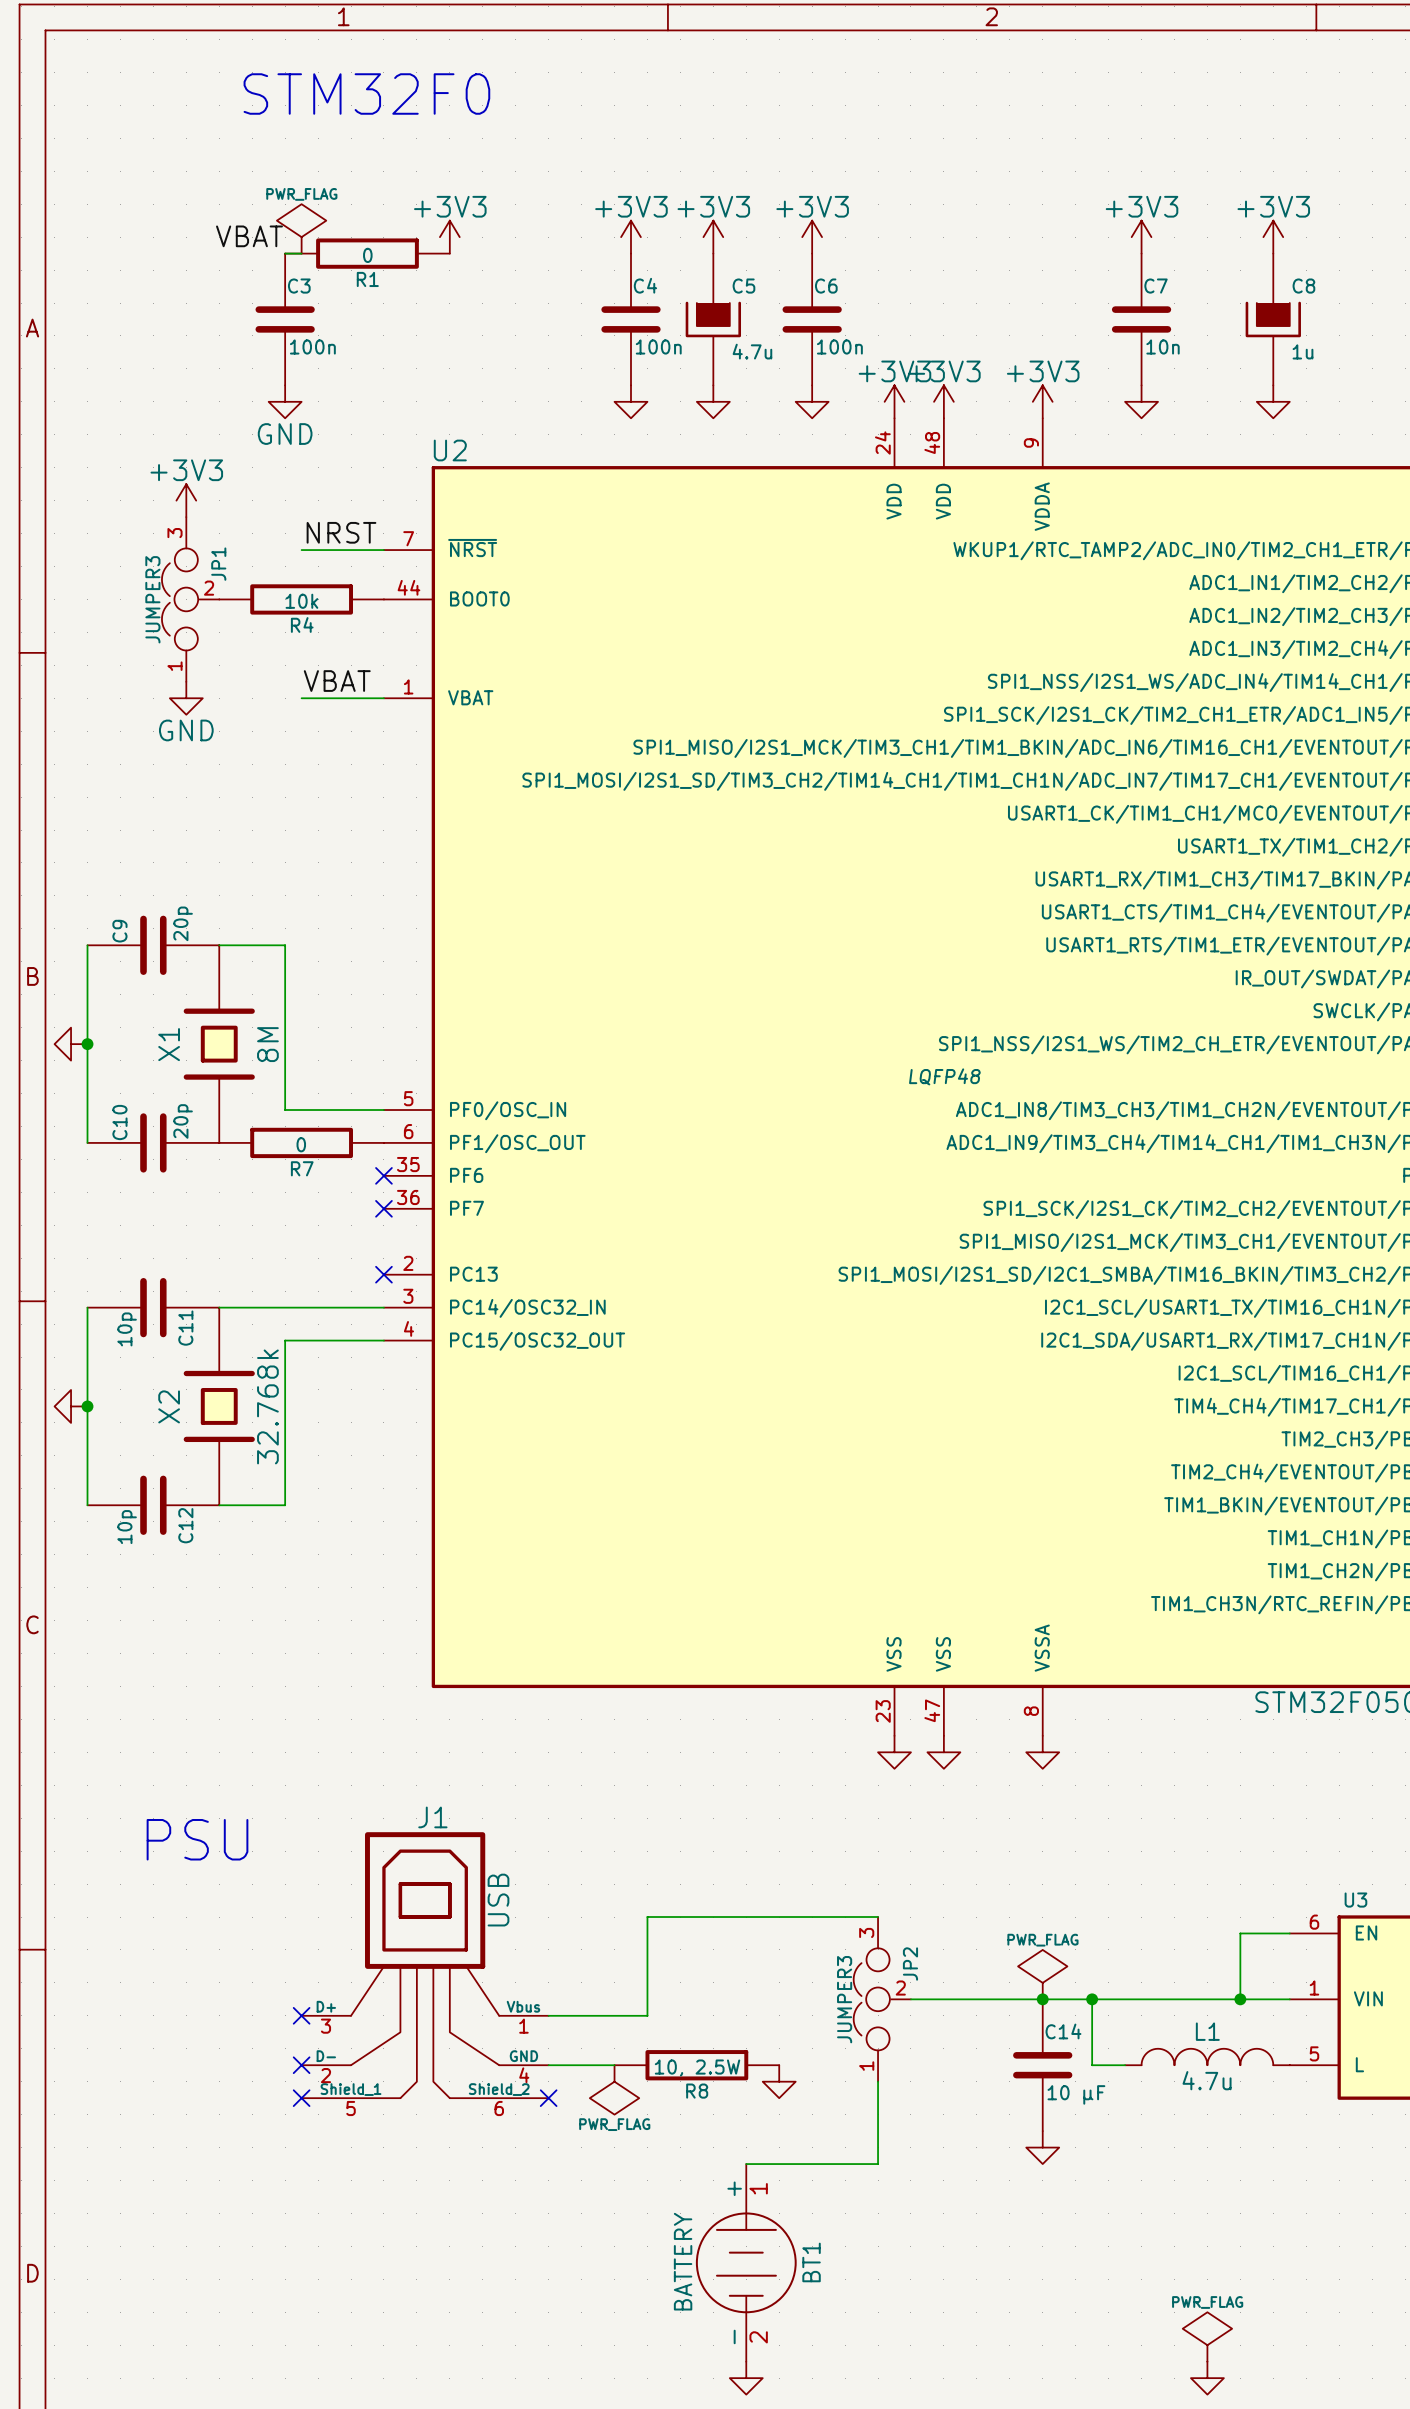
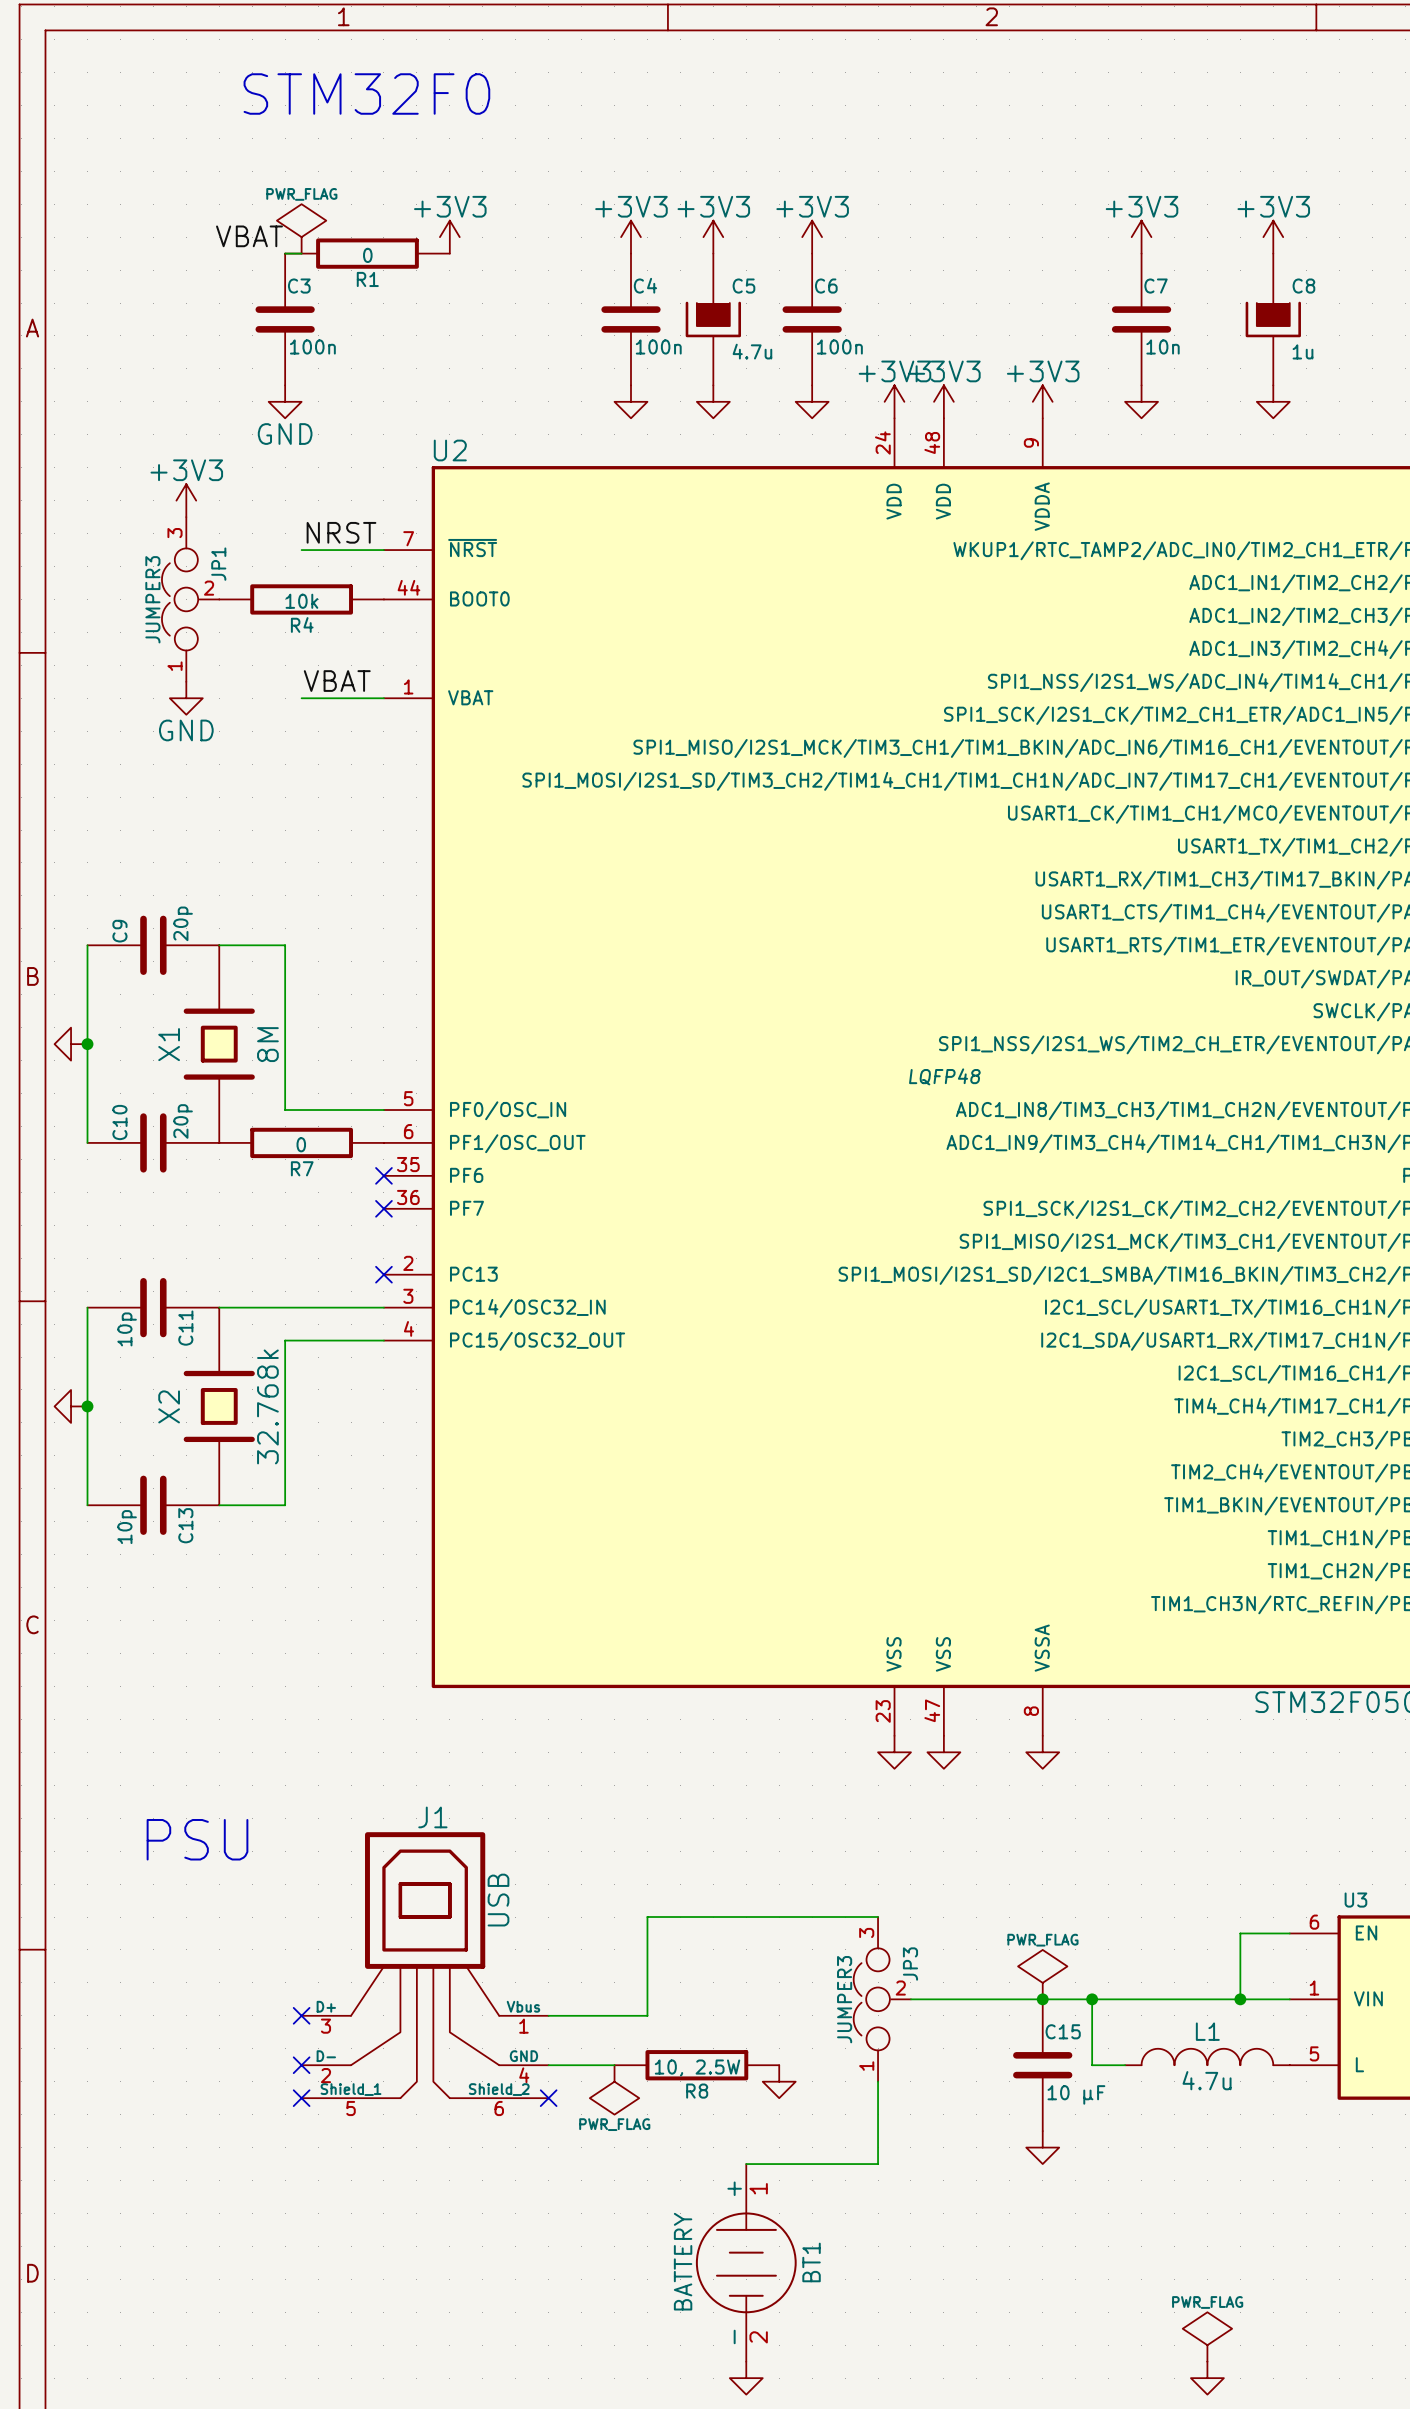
C12 name: C12 (185, 1525) -> C13 (185, 1525)
JP2 name: JP2 (910, 1964) -> JP3 (910, 1964)
C14 name: C14 (1063, 2031) -> C15 (1063, 2031)

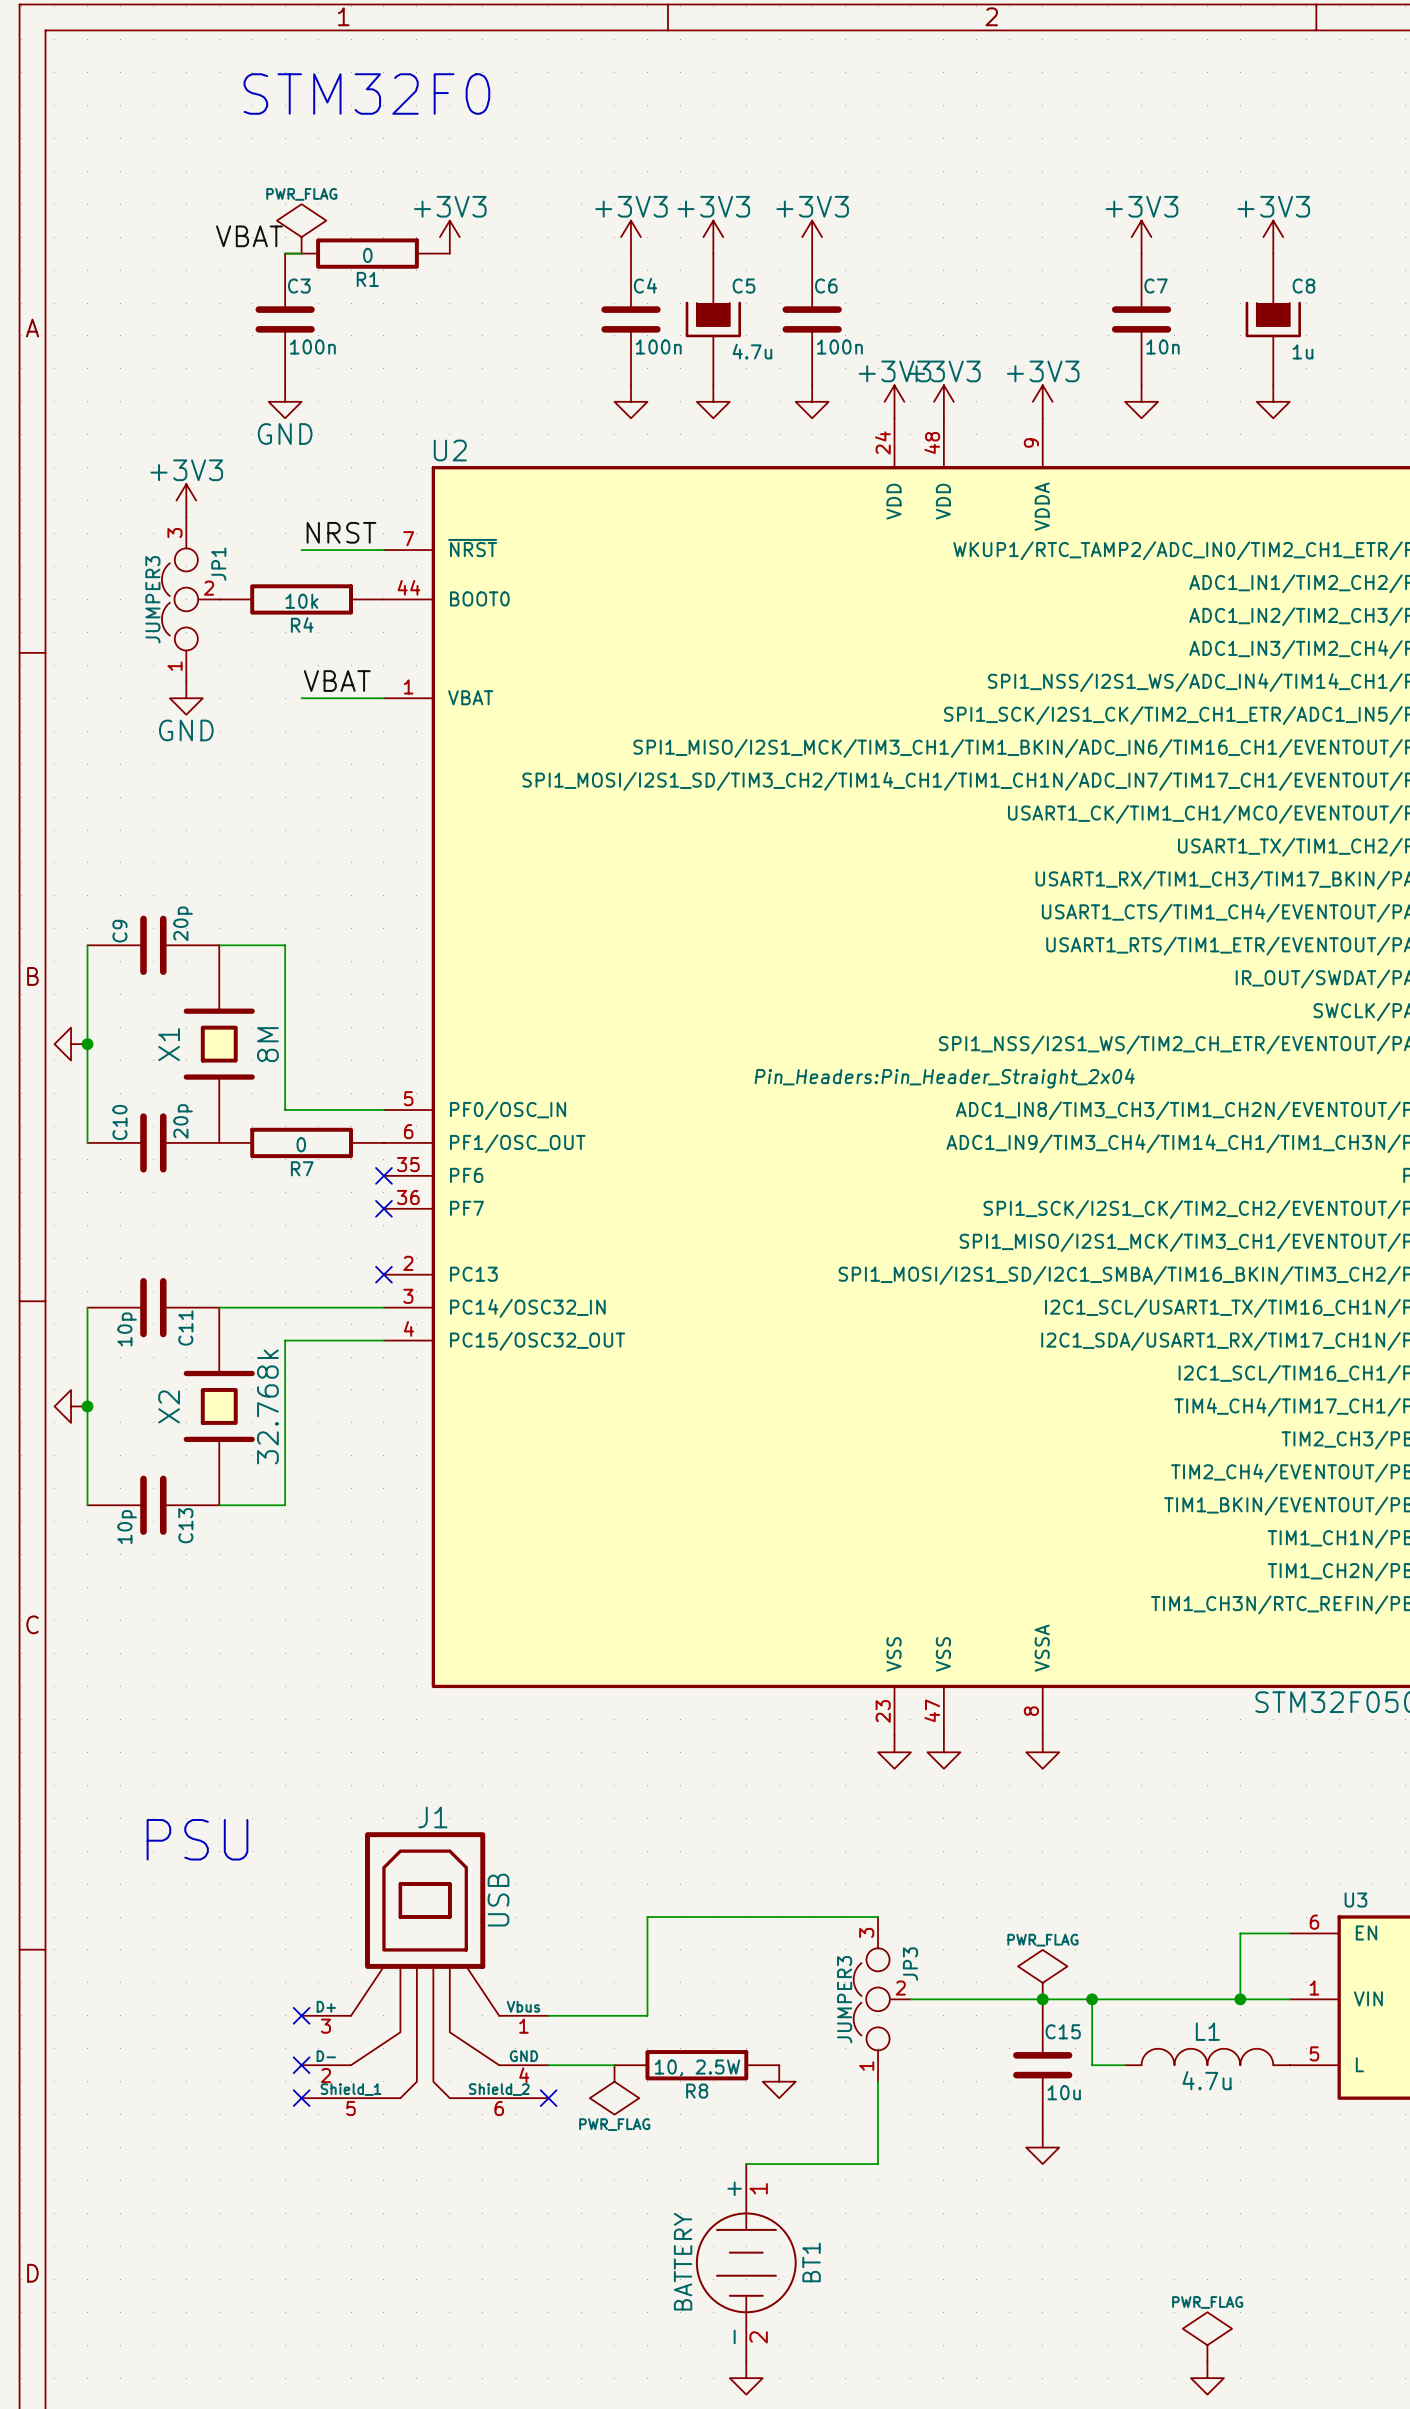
U2 text: LQFP48 (944, 1076) -> Pin_Headers:Pin_Header_Straight_2x04 (944, 1078)
C15 value: 10 μF (1076, 2094) -> 10u (1064, 2092)

